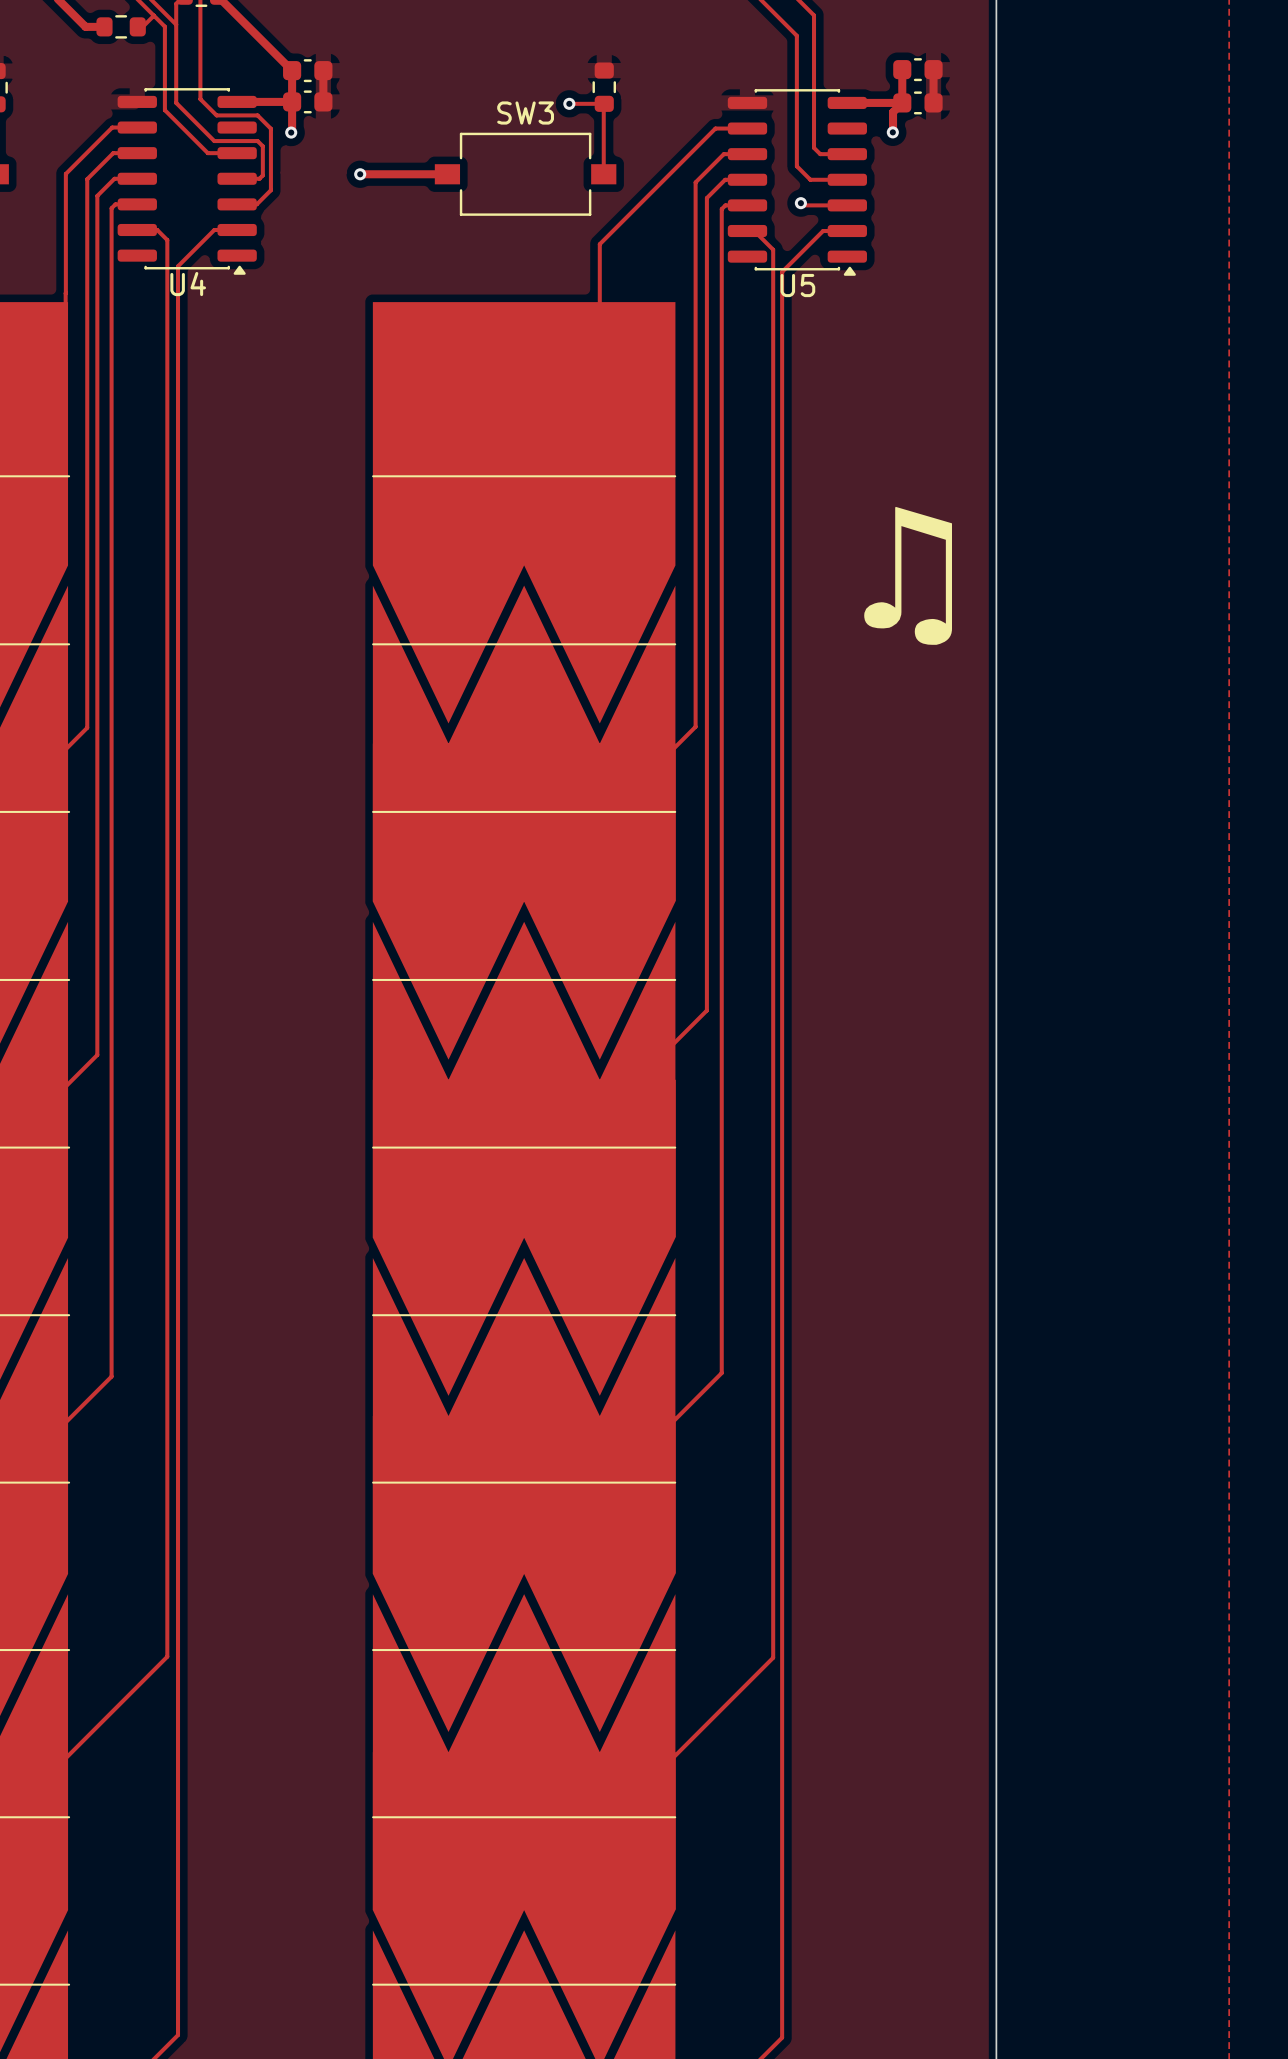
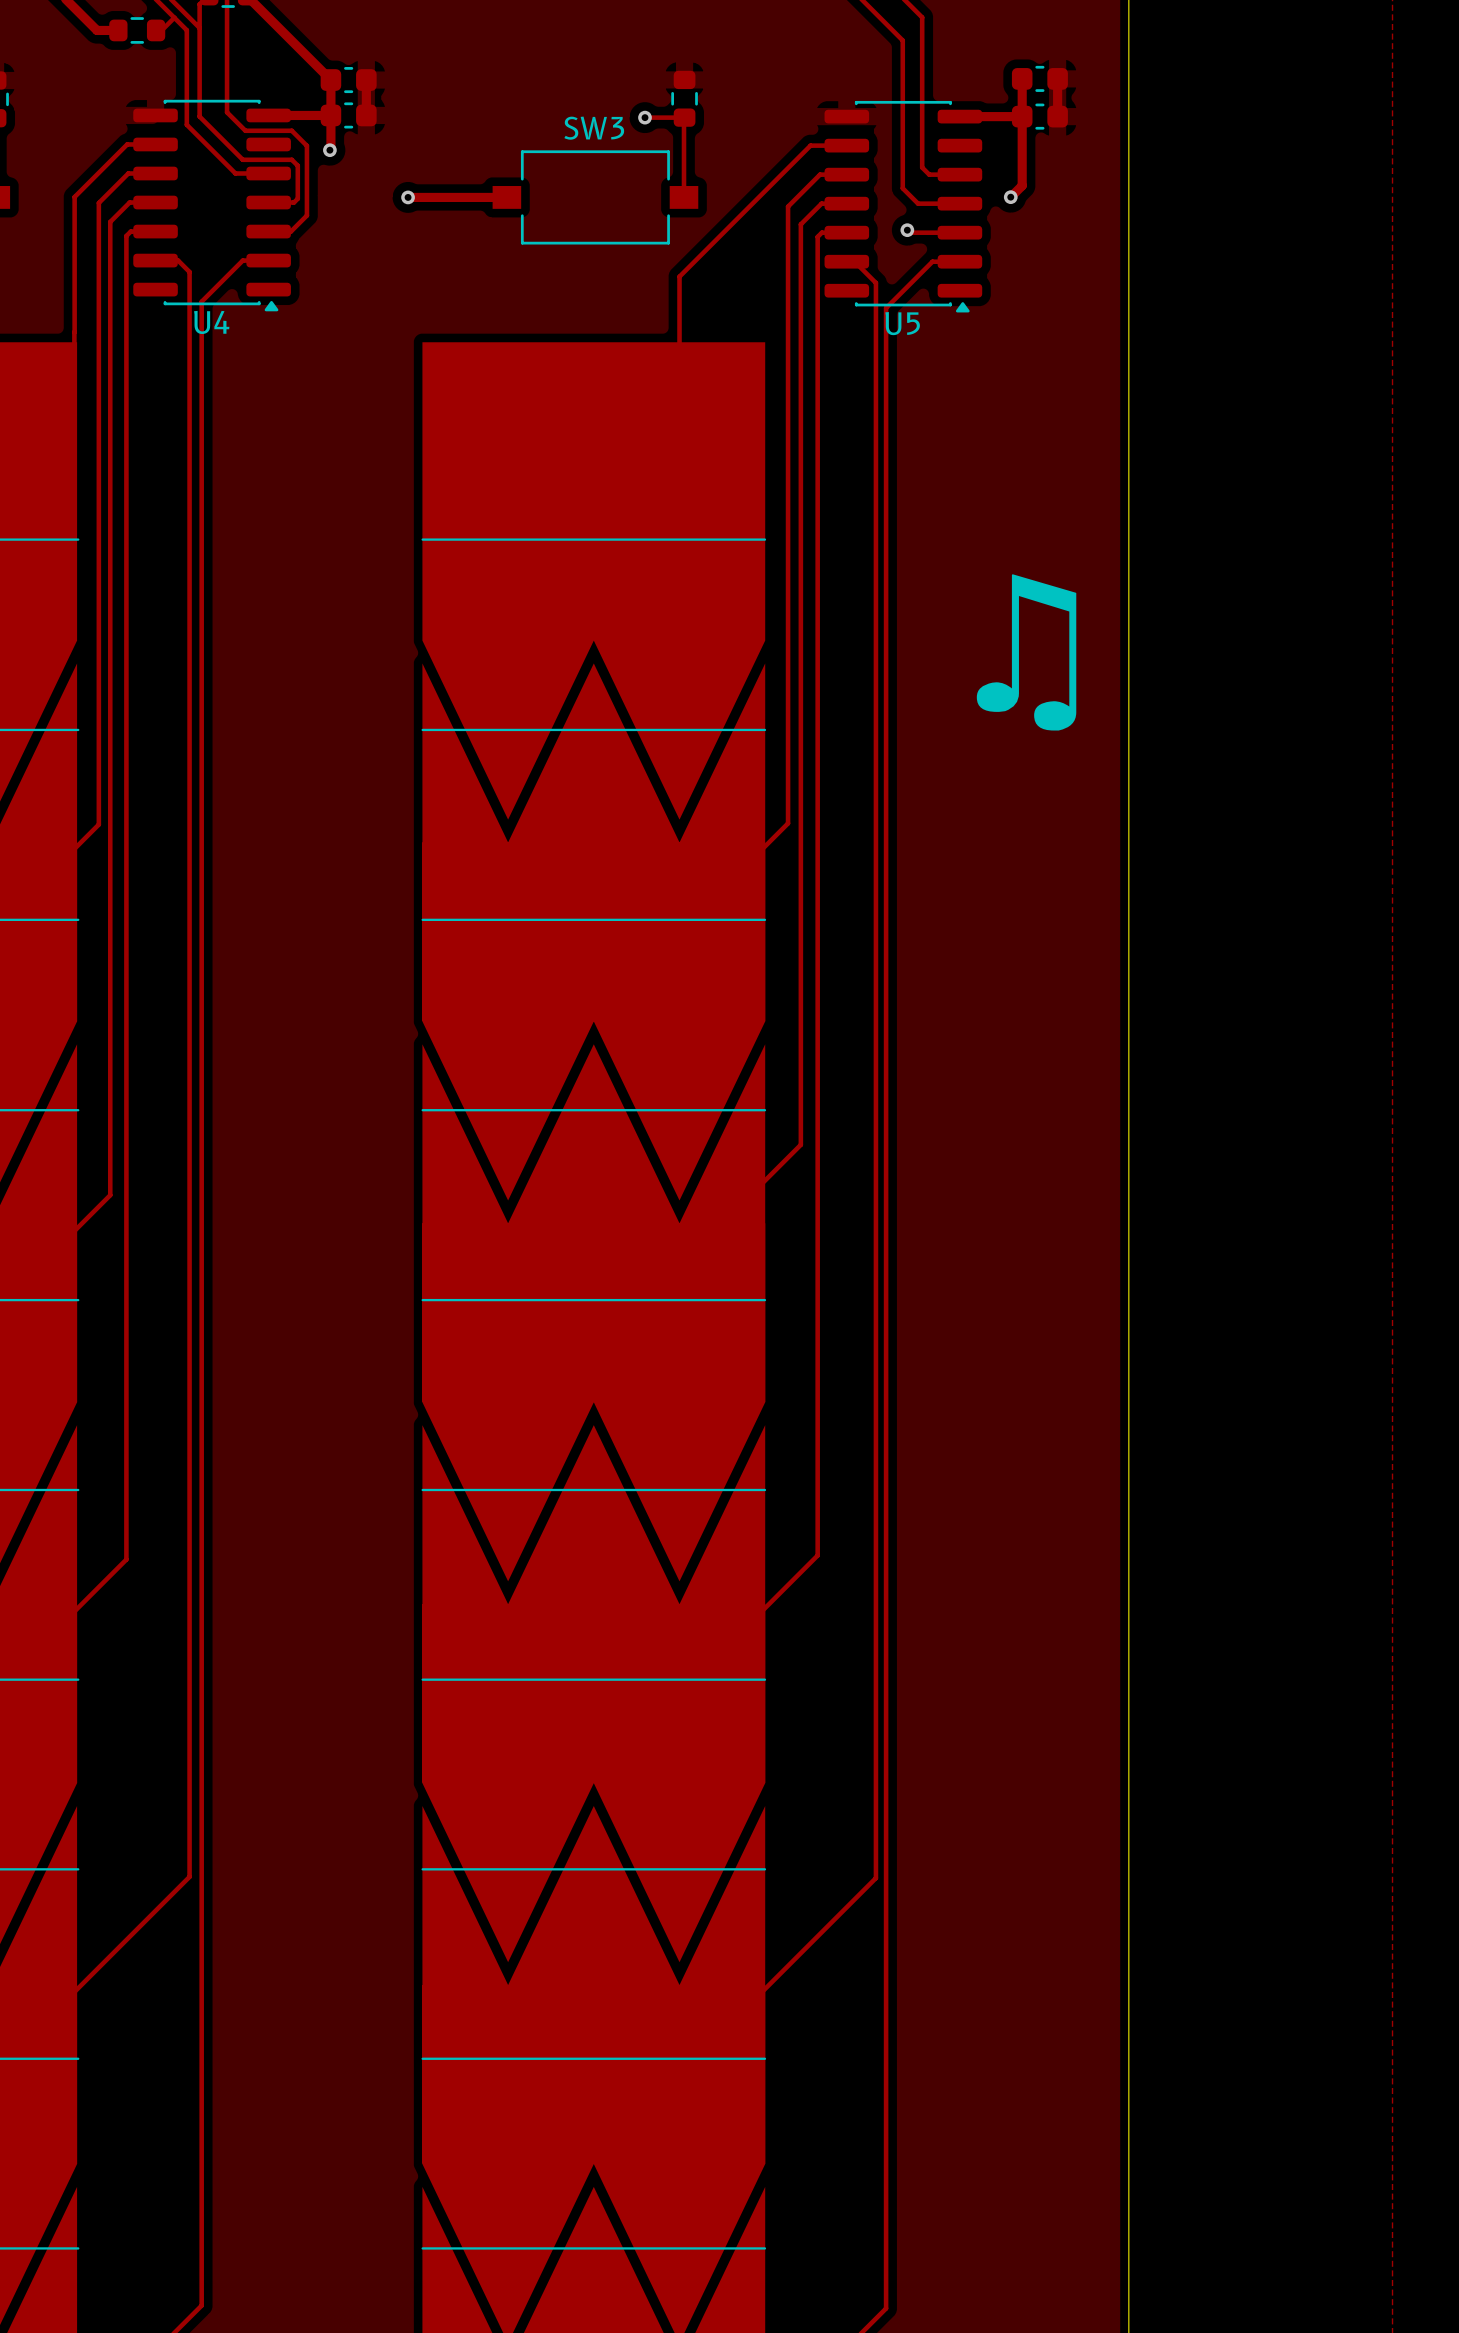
track: (902, 102) (893, 112) (893, 132) -> (1022, 116) (1022, 185) (1010, 197)
via position: (892, 132) -> (1010, 197)

